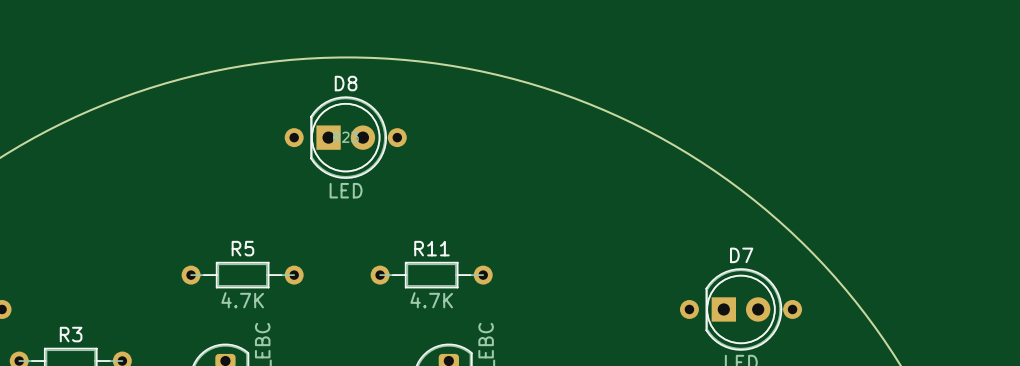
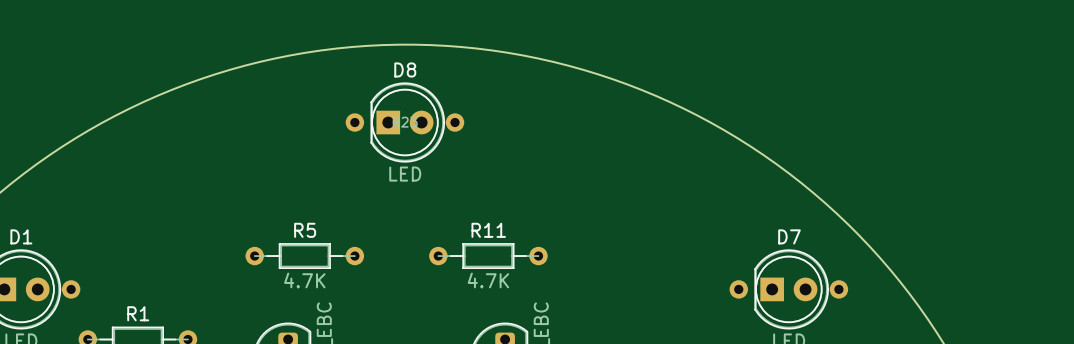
R3 name: R3 (71, 334) -> R1 (138, 313)

